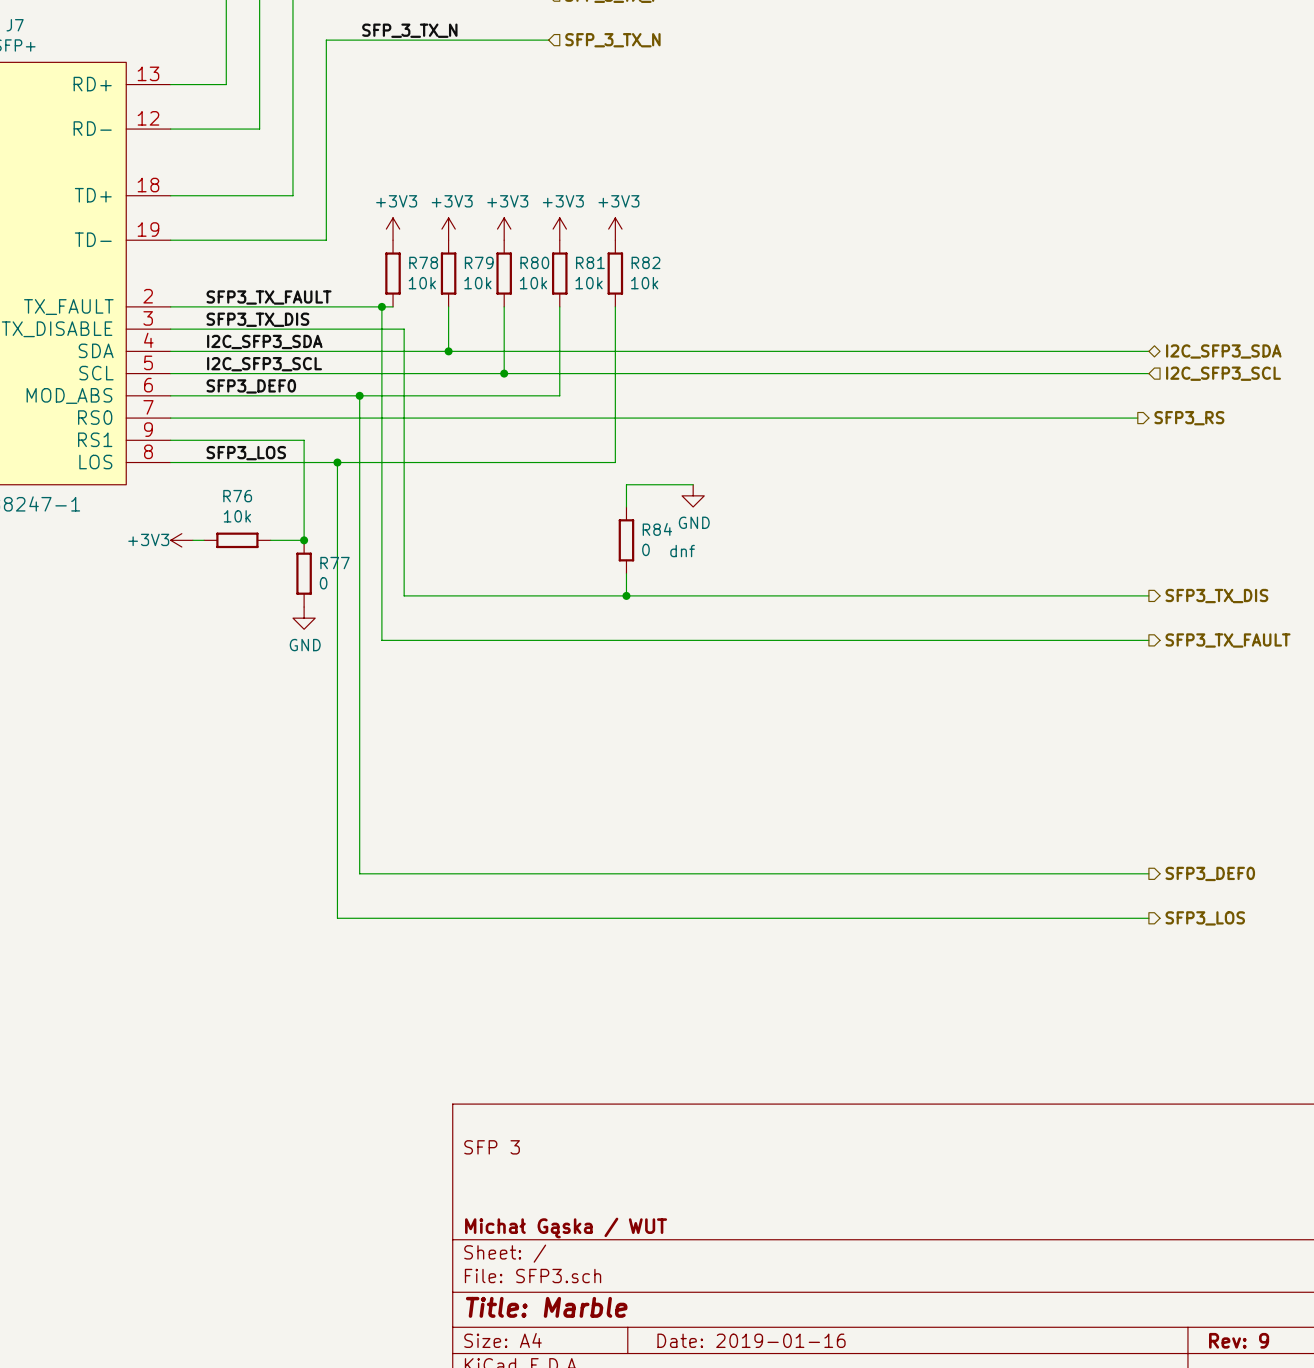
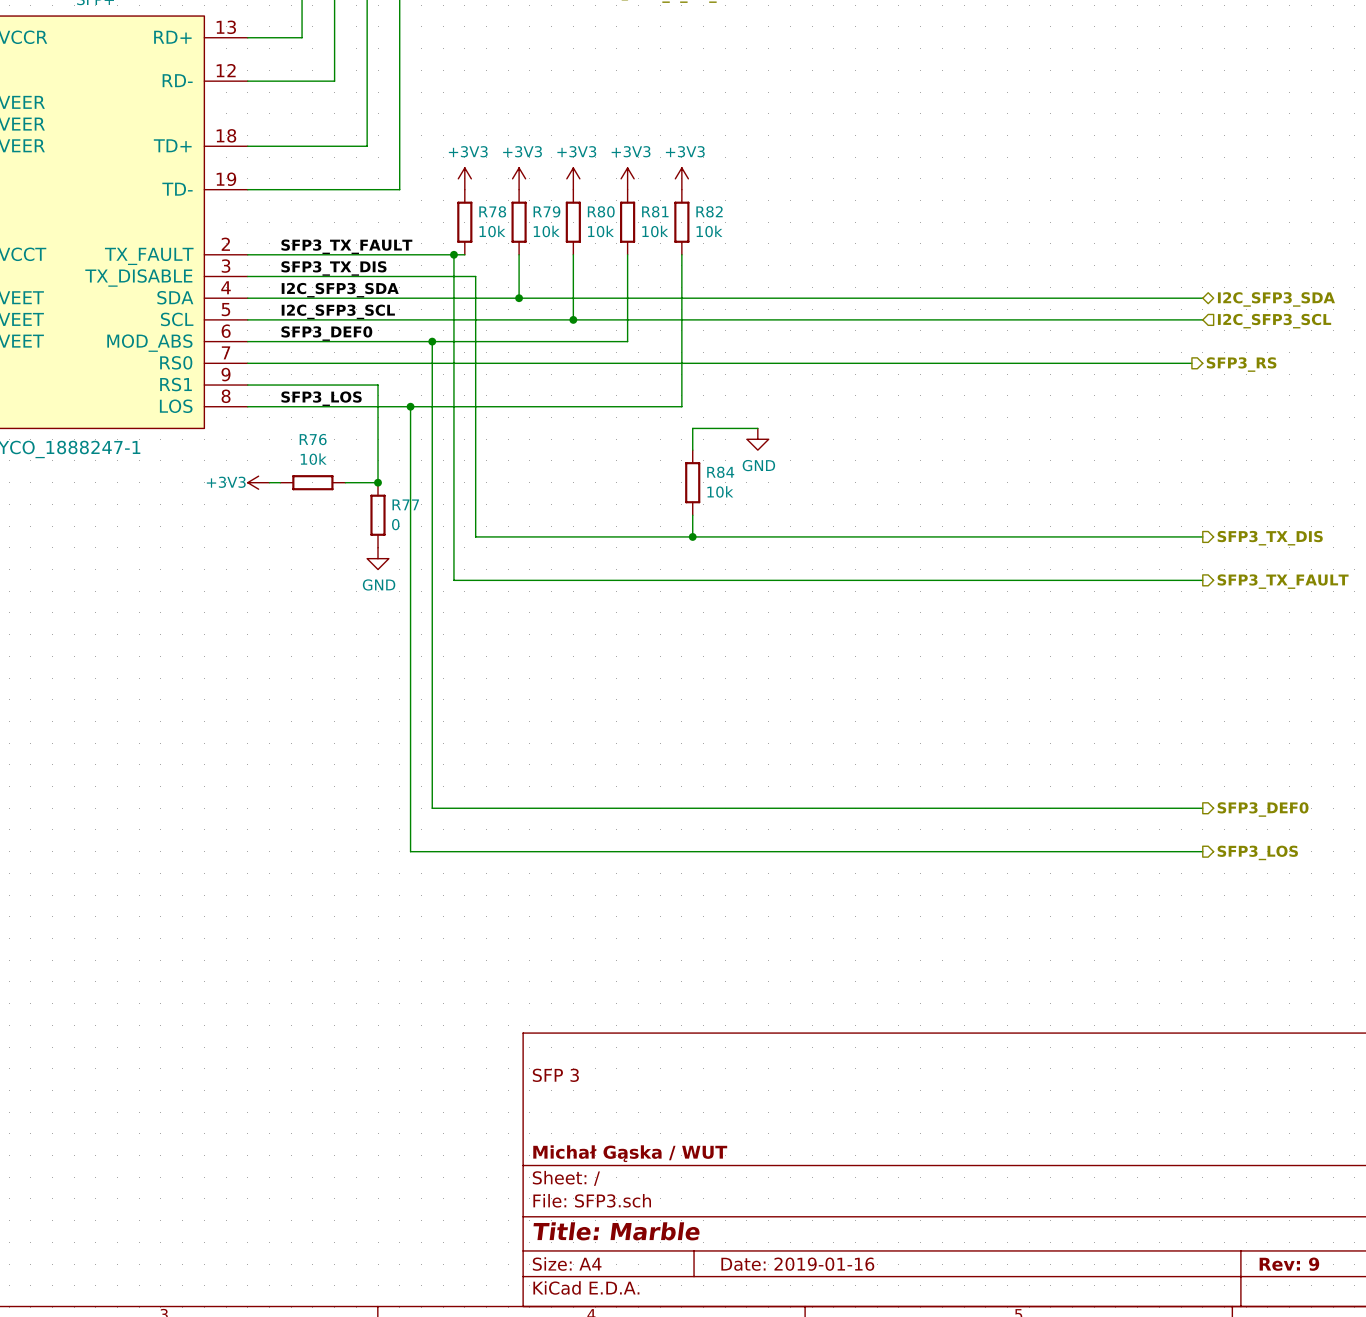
R84 text: 0 (645, 549) -> 10k (720, 491)
R84 text: dnf (682, 551) -> none

